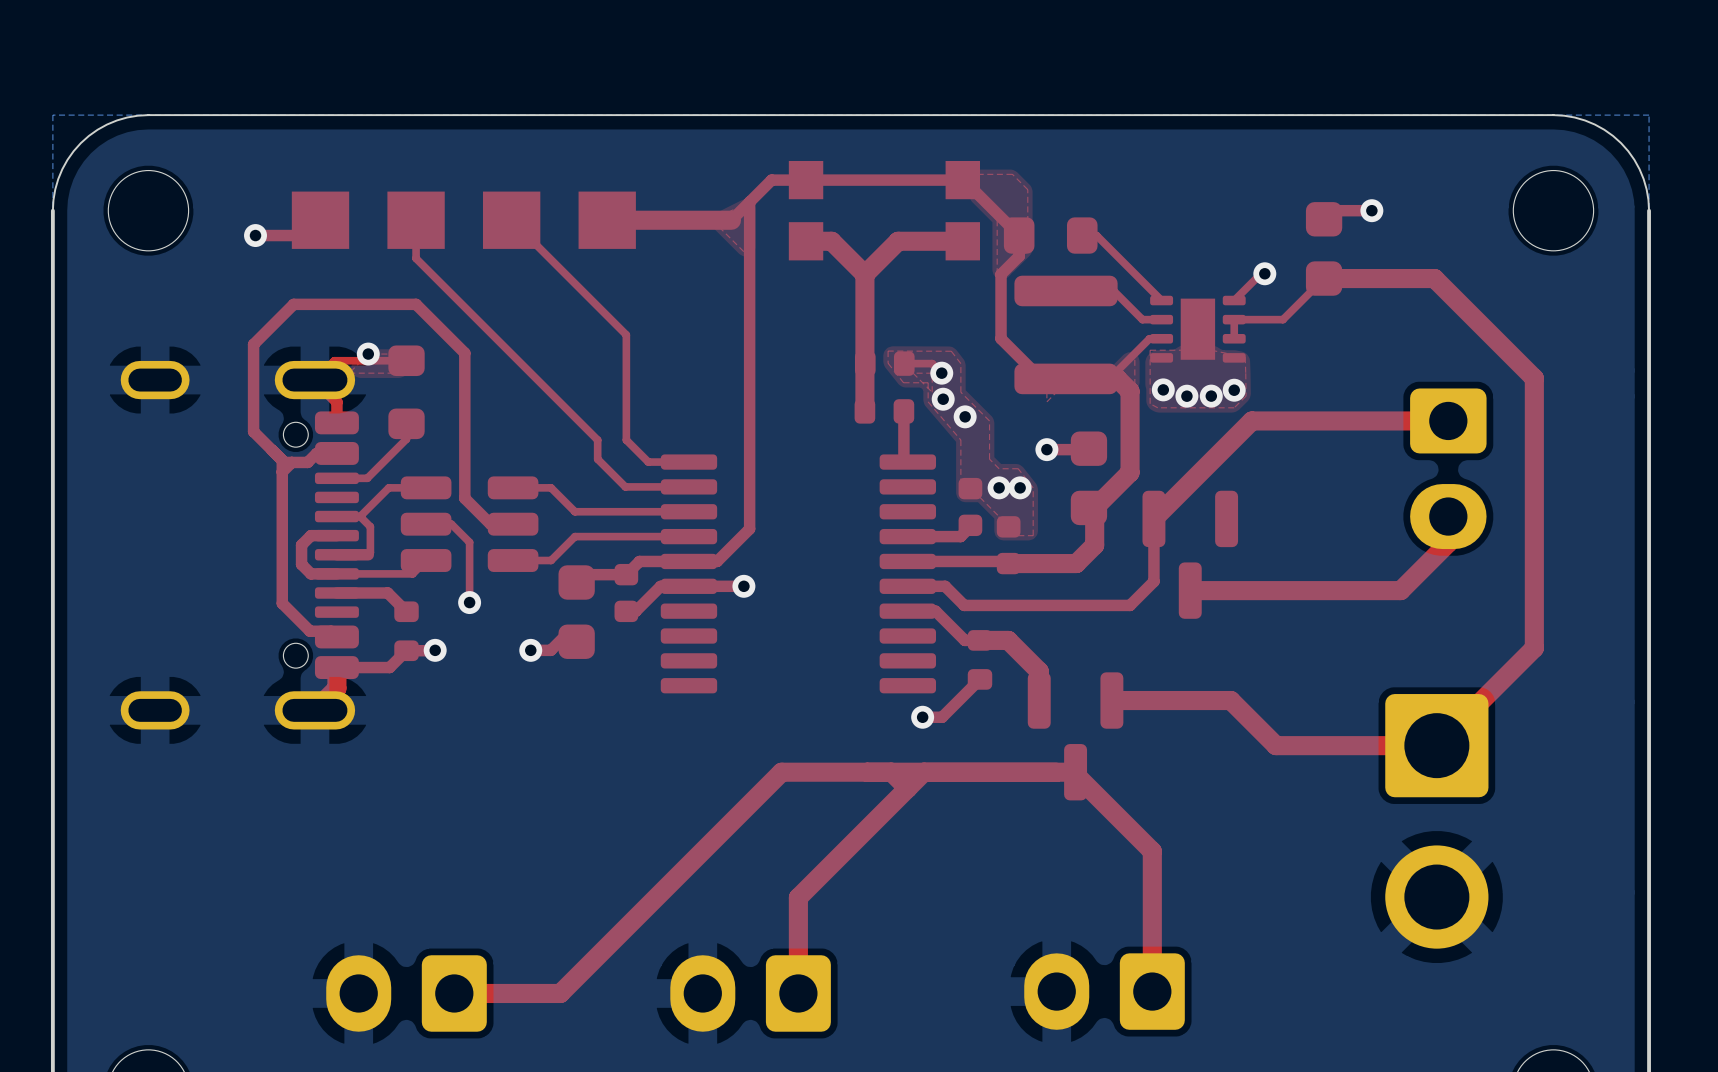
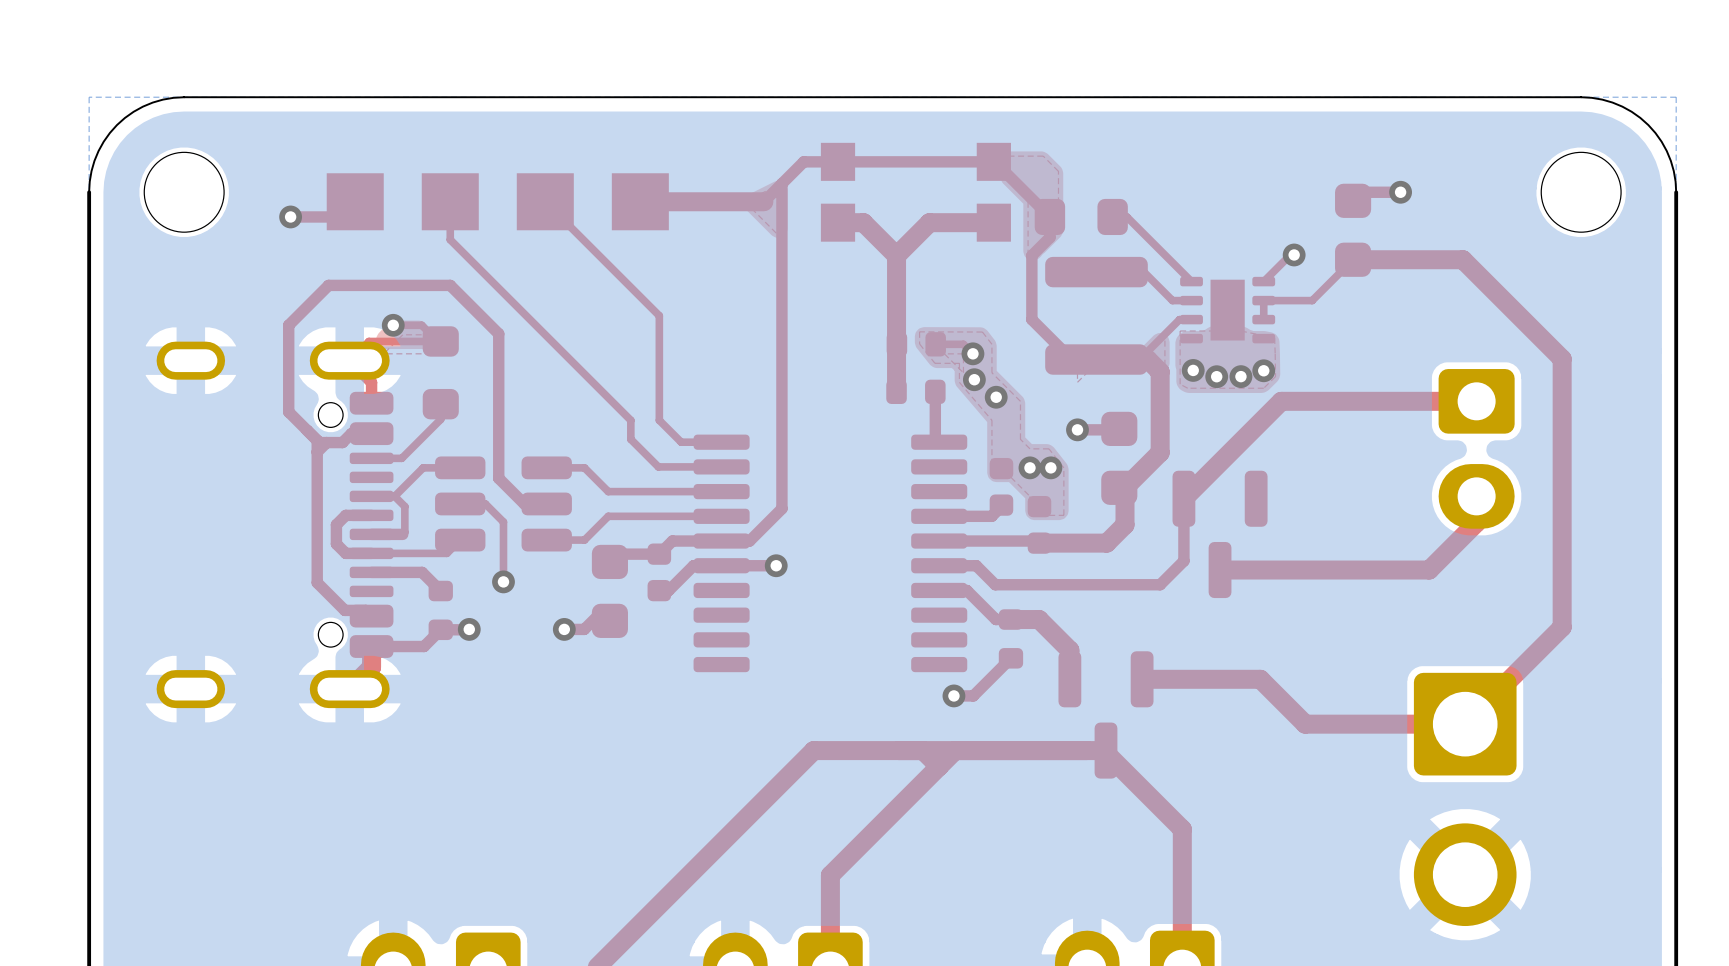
via position: (368, 354) -> (393, 325)

